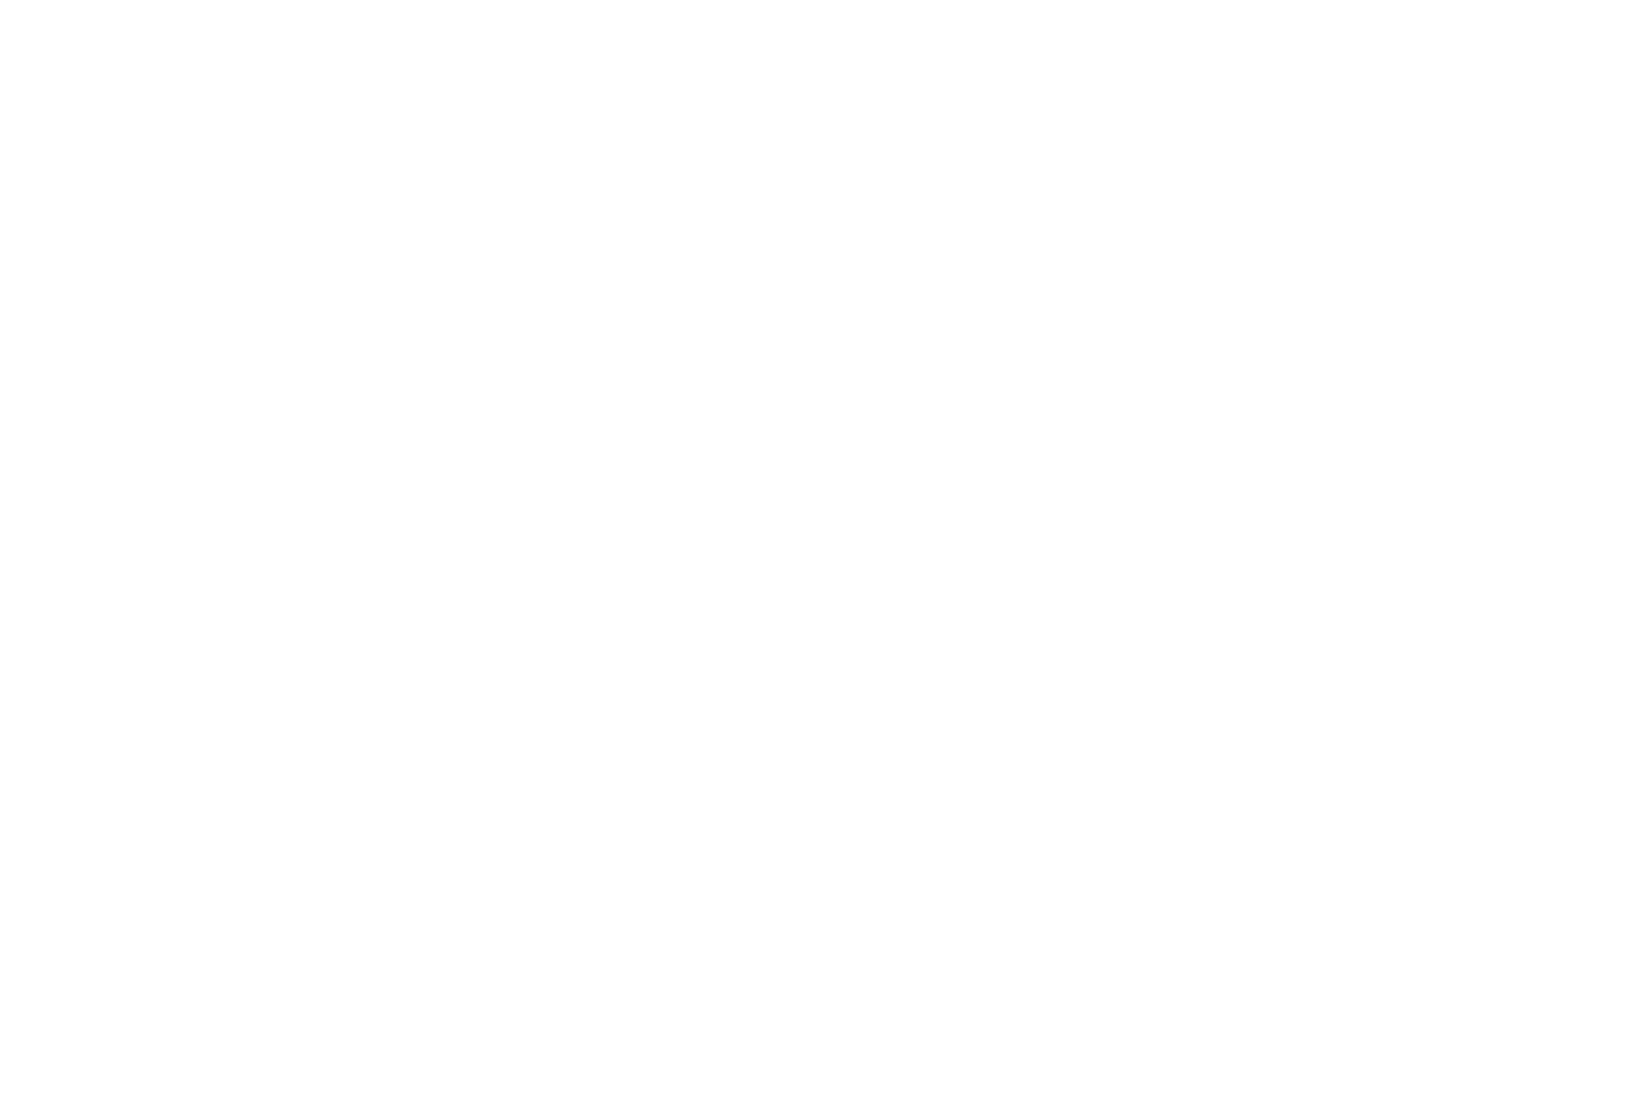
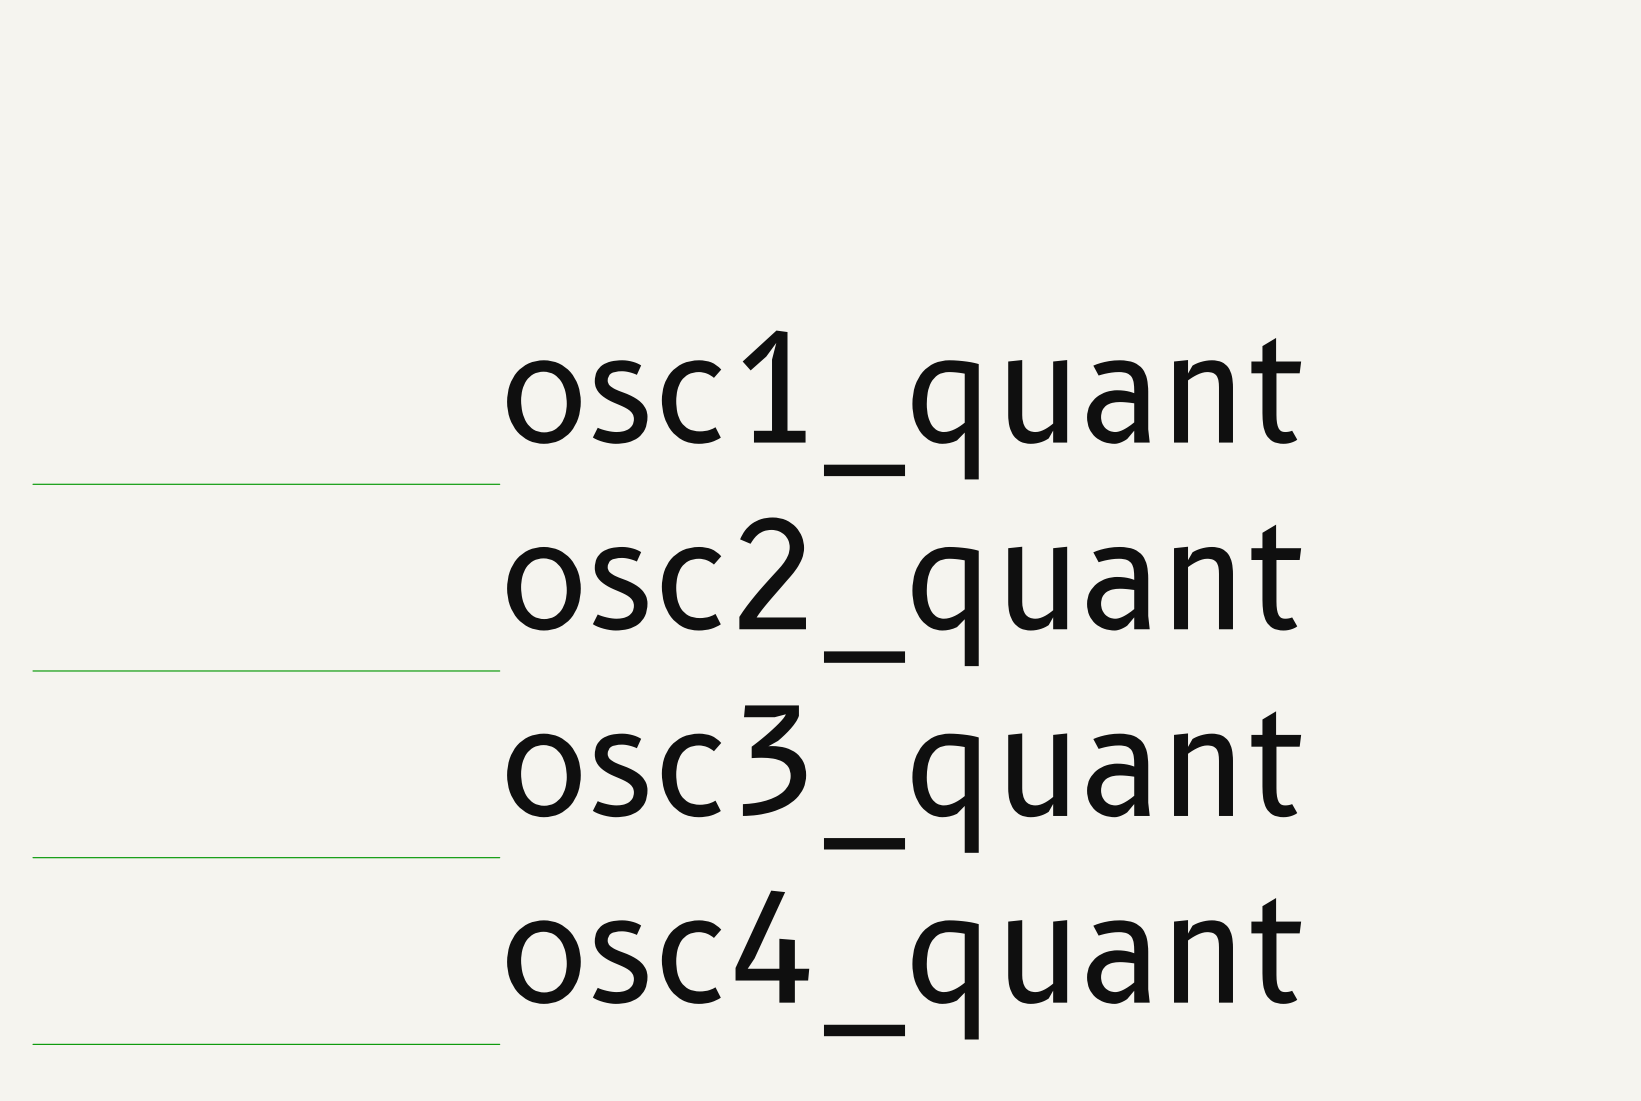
label: none -> osc1_quant (904, 404)
wire: none -> (32, 484) (499, 484)
label: none -> osc2_quant (904, 591)
wire: none -> (32, 670) (499, 670)
label: none -> osc3_quant (904, 779)
wire: none -> (32, 857) (499, 857)
label: none -> osc4_quant (904, 965)
wire: none -> (32, 1044) (499, 1044)

